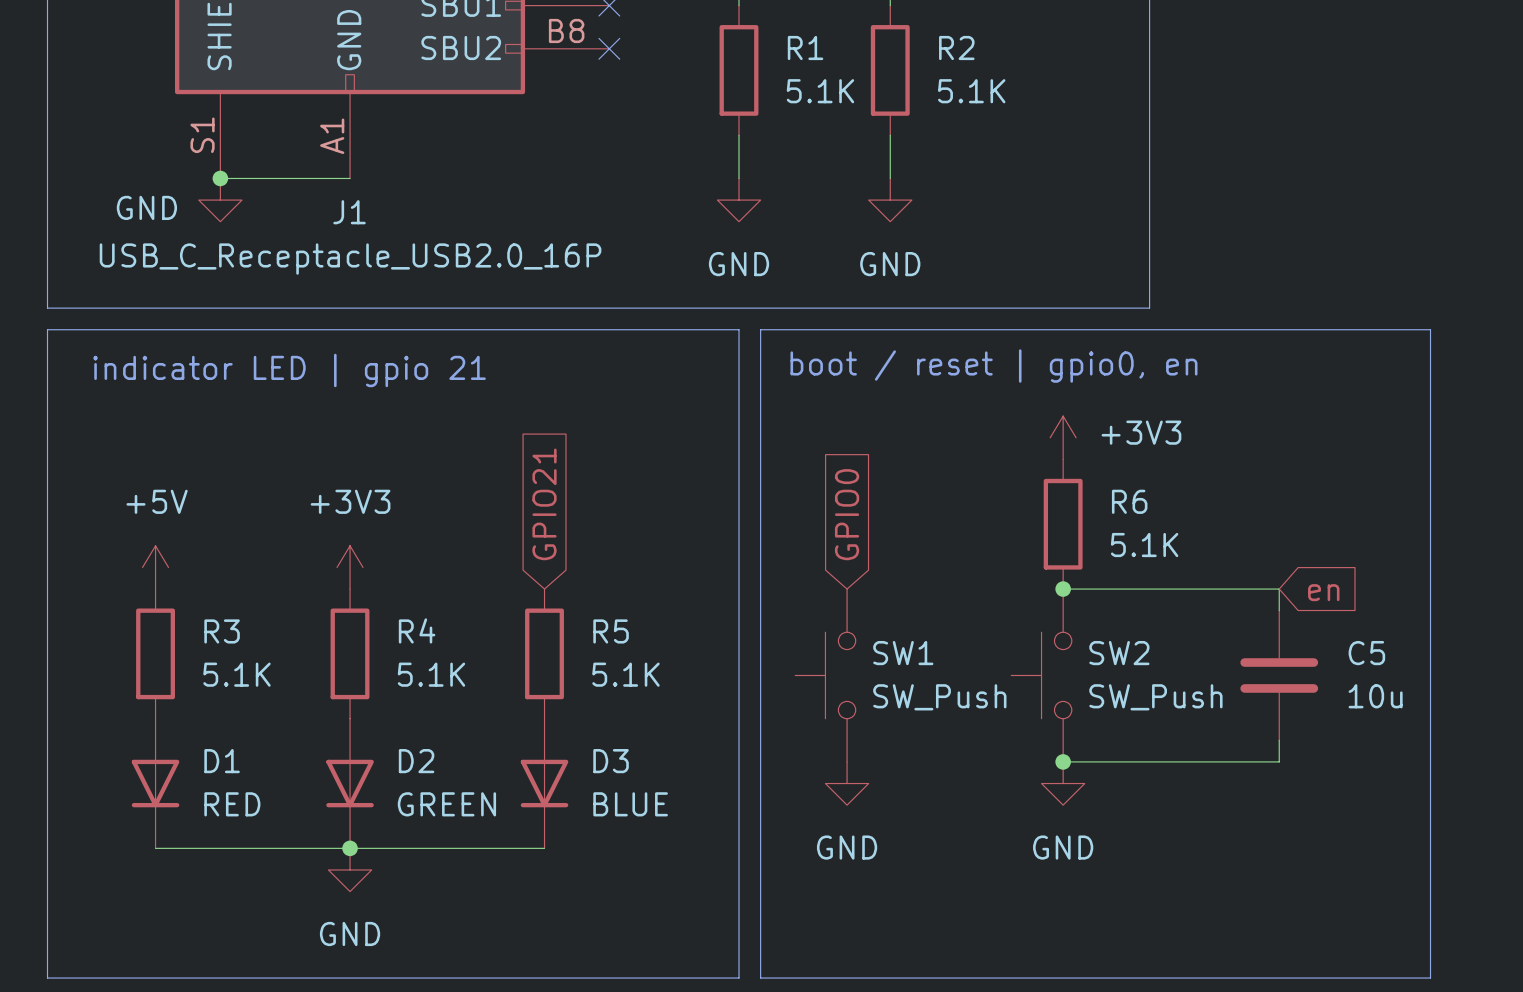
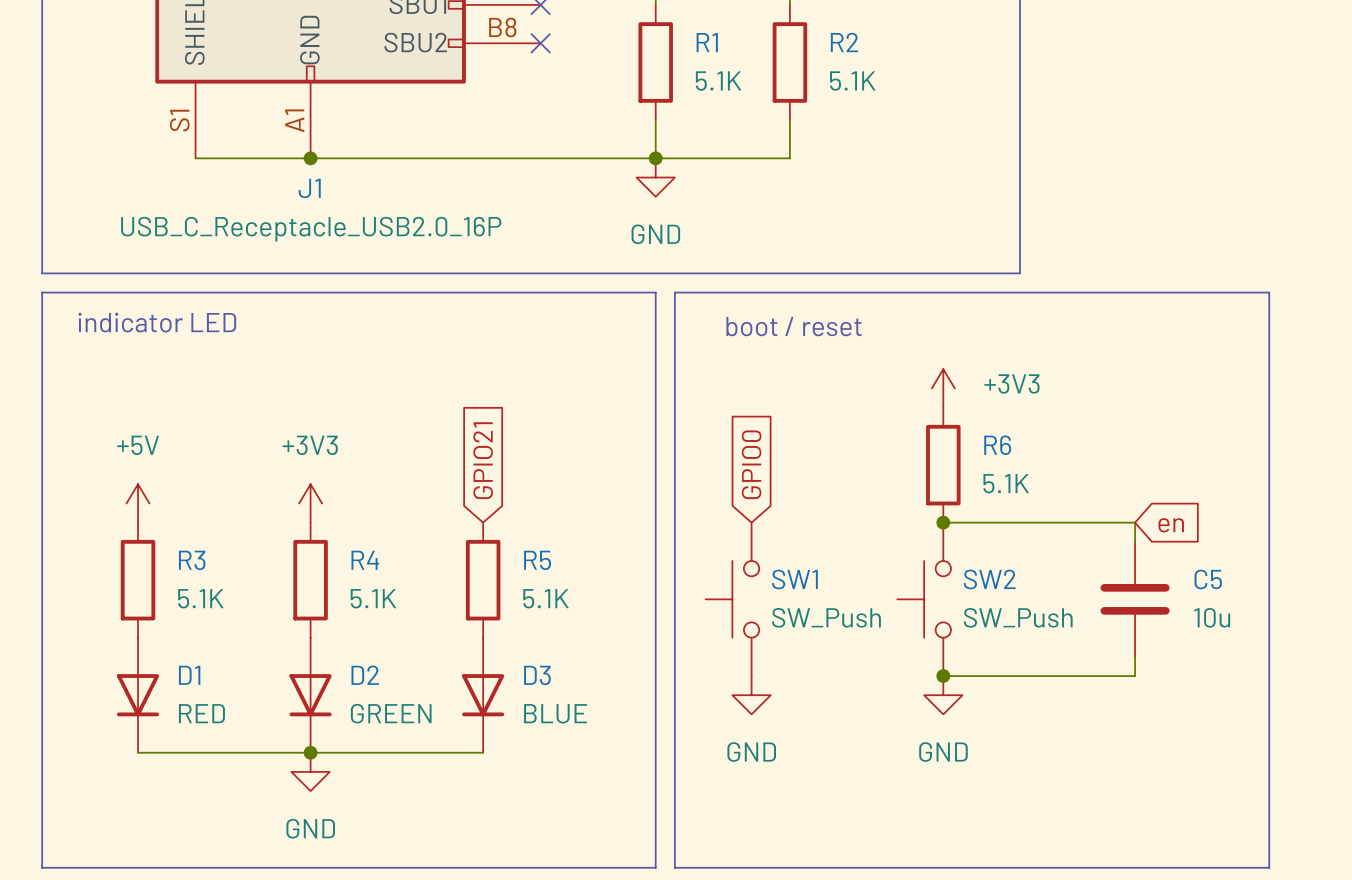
junction: (220, 178) -> none
wire: none -> (310, 158) (789, 158)
junction: none -> (310, 158)
junction: none -> (655, 158)
power symbol: GND (220, 200) -> none
power symbol: GND (890, 200) -> none
text: boot / reset | gpio0, en (994, 366) -> boot / reset (794, 326)
text: indicator LED | gpio 21 (289, 370) -> indicator LED (157, 322)

